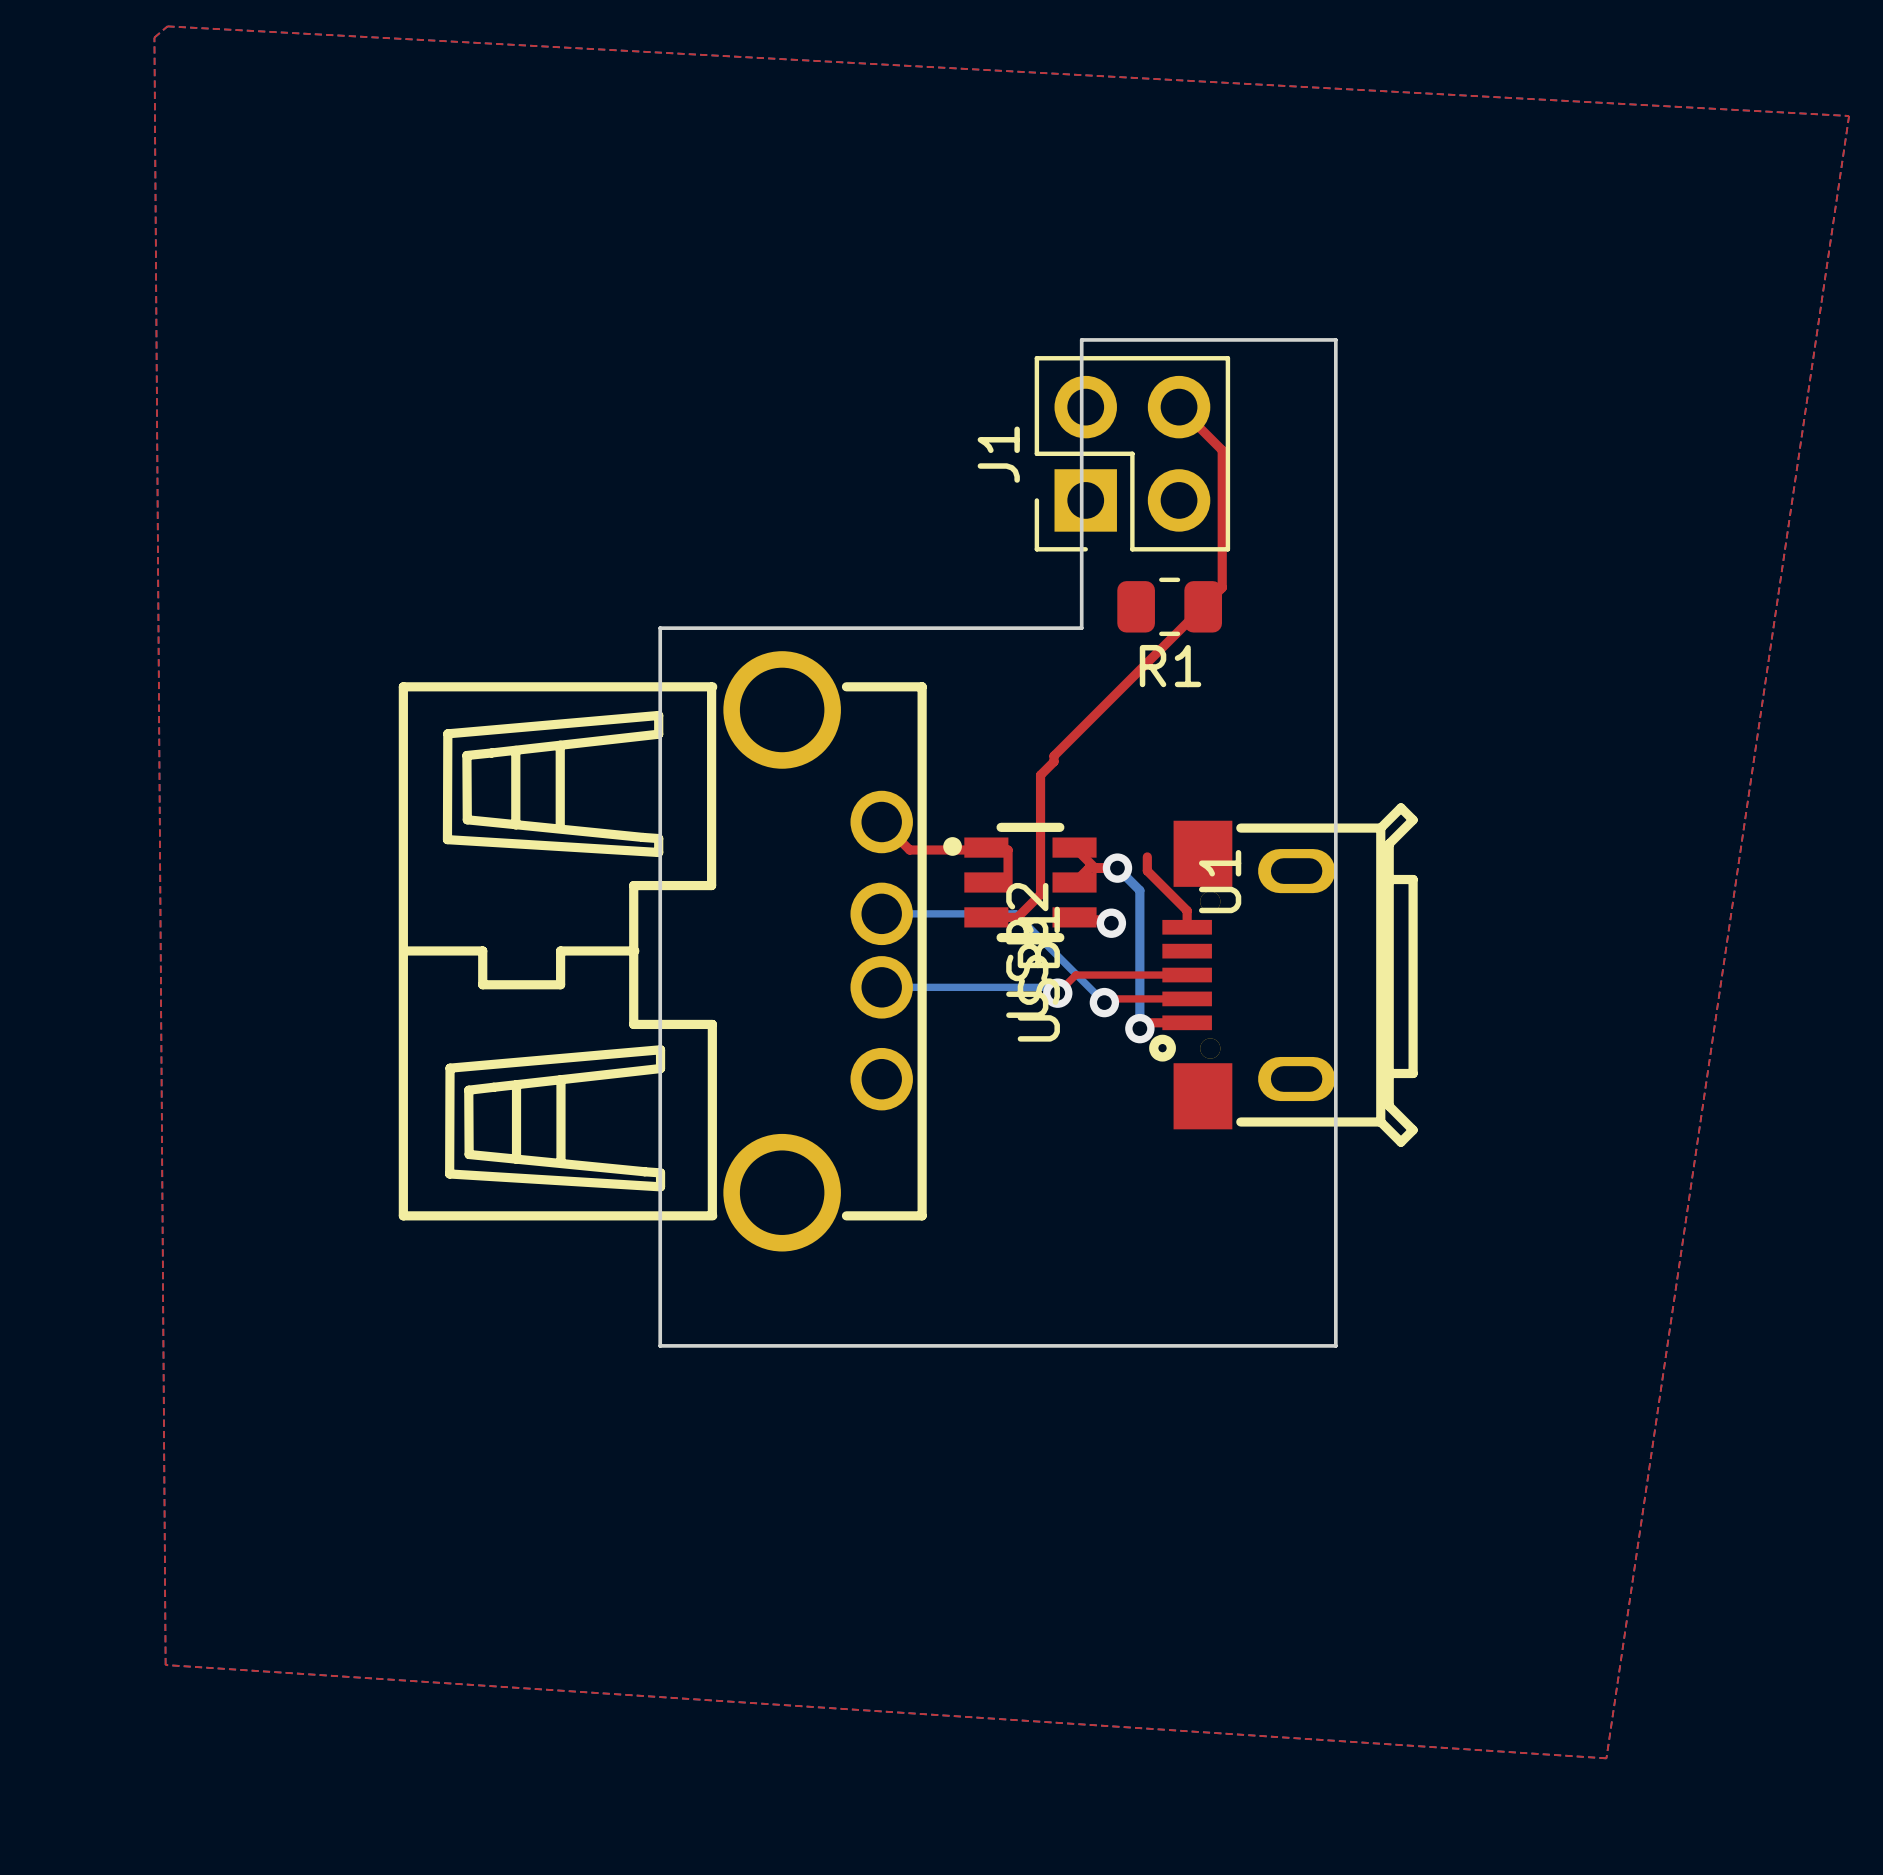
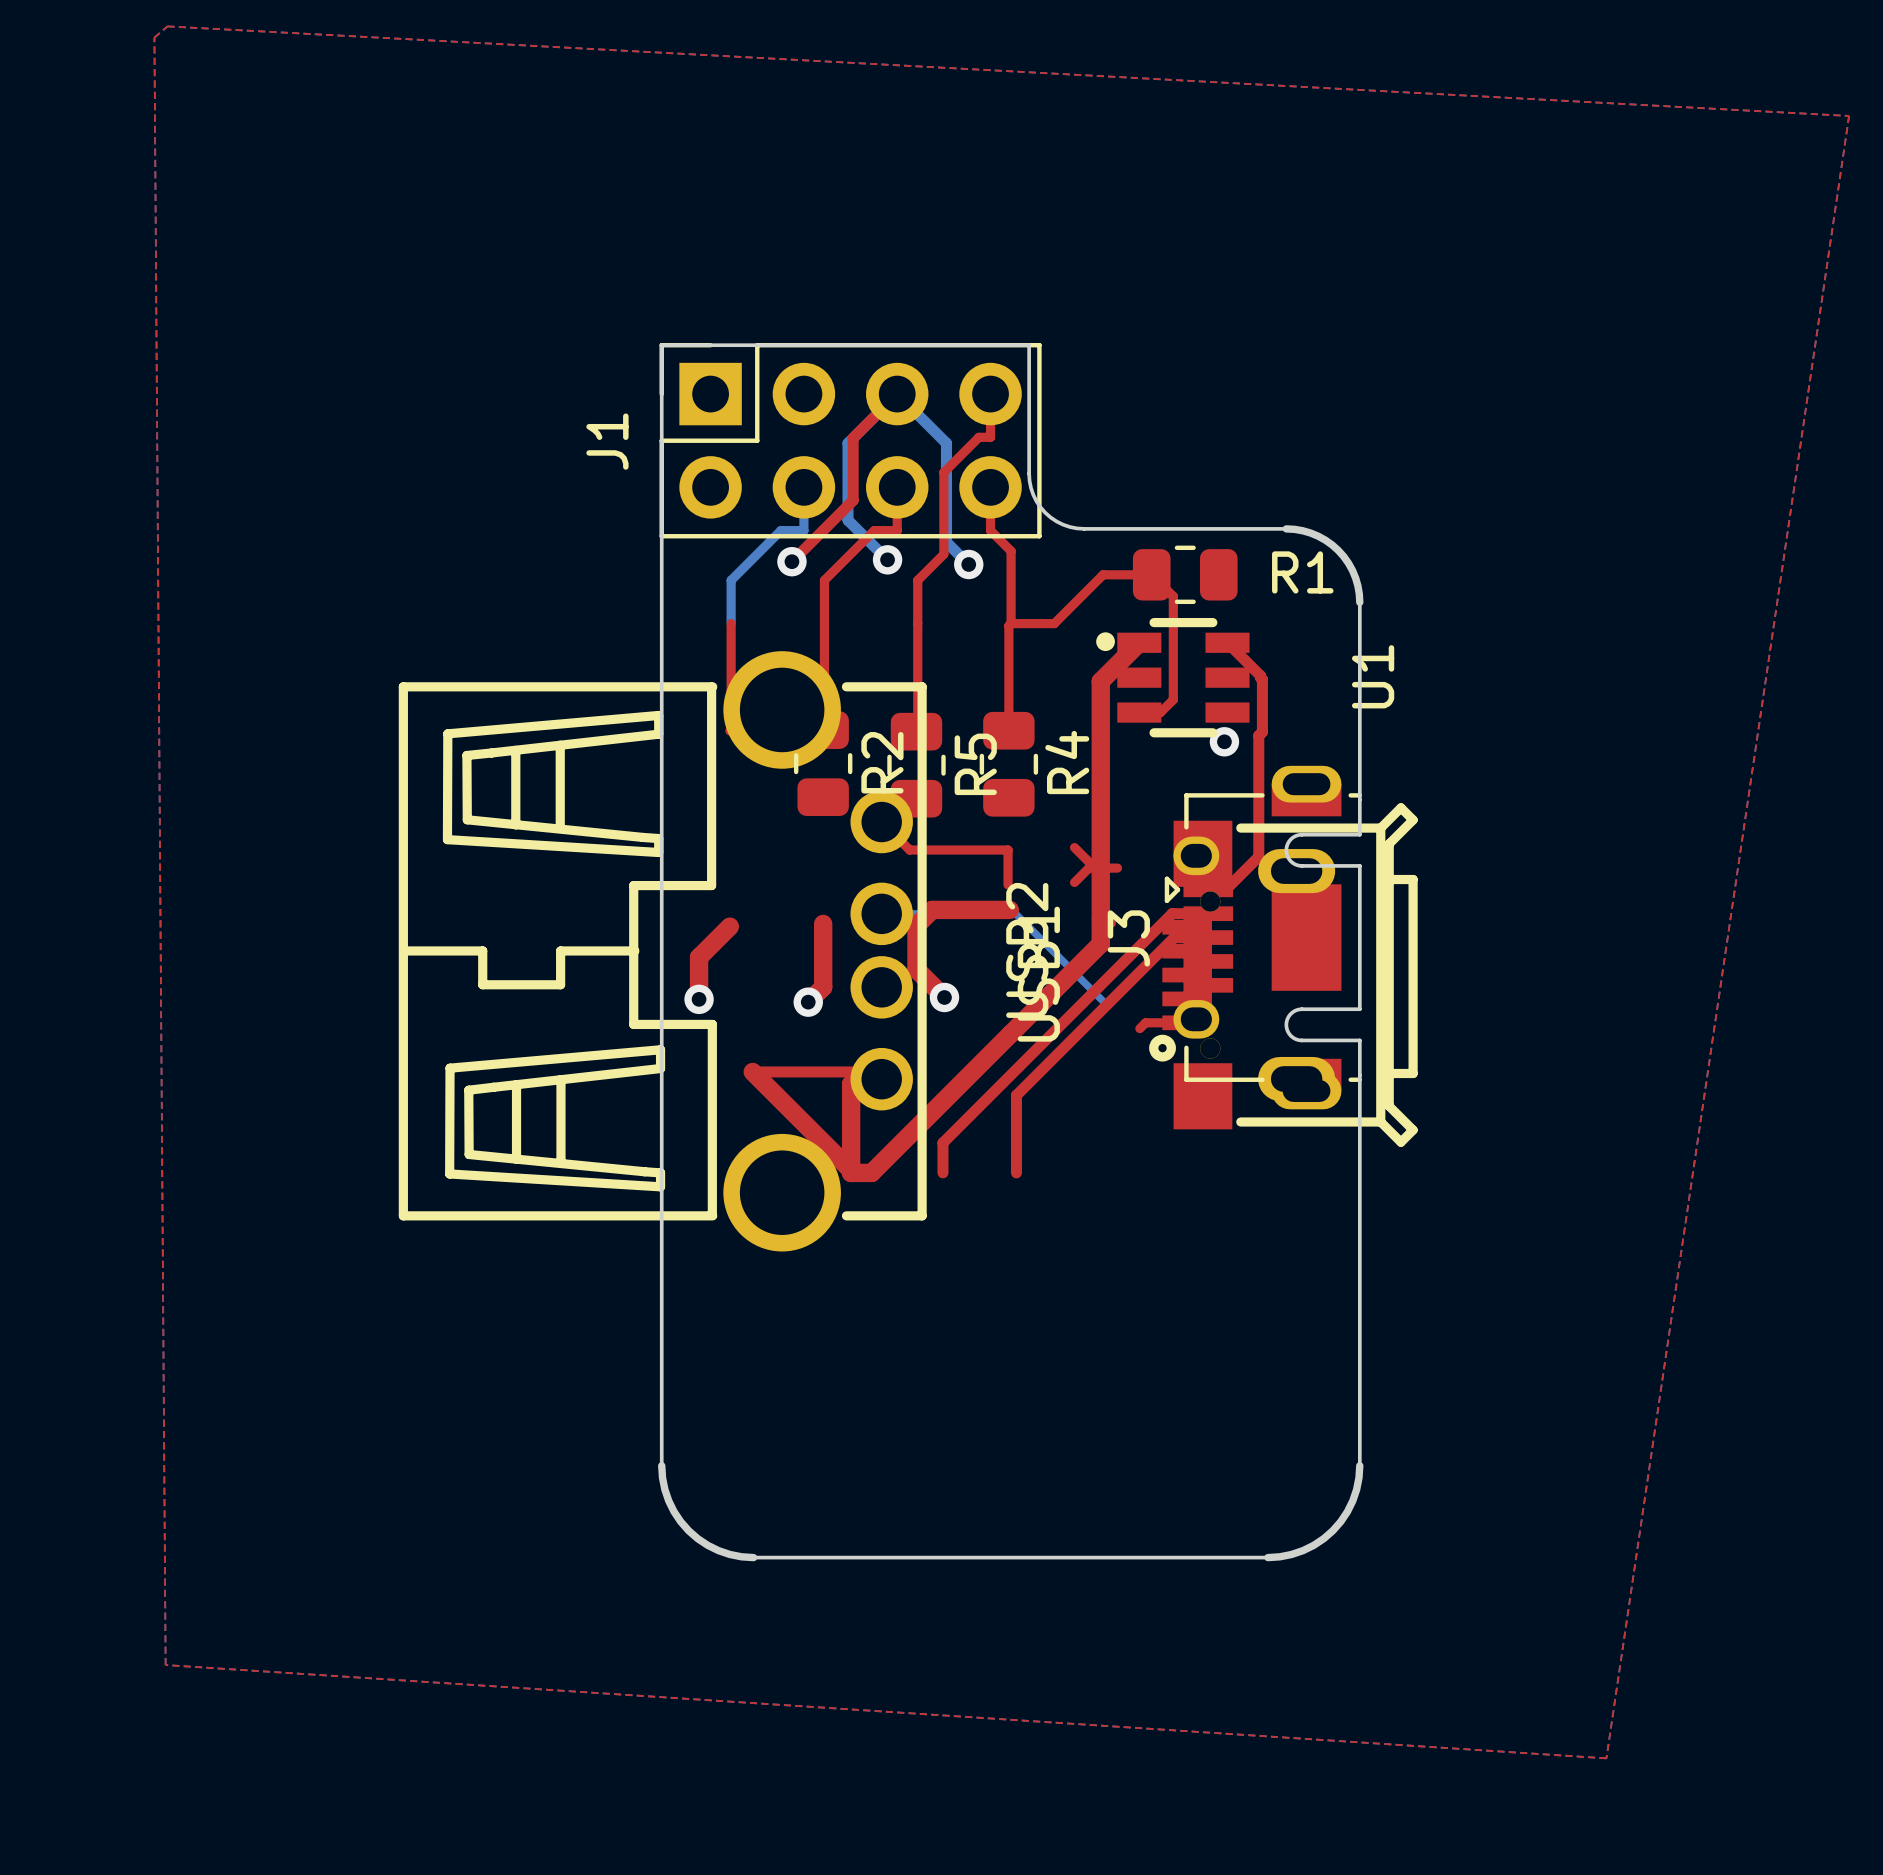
board edge: (1081, 339) (1335, 339) (1335, 1345) (660, 1345) (660, 628) (1081, 628) (1081, 339) -> none
J1 footprint: [1034, 356, 1231, 552] -> [659, 342, 1042, 539]
top track: none -> (897, 394) (853, 438) (853, 500) (791, 561) (785, 561)
top track: none -> (990, 394) (990, 437) (979, 437) (943, 472) (943, 554) (917, 580) (916, 731)
top track: (1179, 407) (1222, 450) (1222, 587) (1054, 755) (1054, 761) (1040, 775) (1040, 894) (1017, 917) (986, 917) -> none
J1 name position: J1 (998, 454) -> J1 (607, 441)
bottom track: none -> (803, 487) (803, 530) (780, 530) (731, 580) (731, 623)
top track: none -> (897, 487) (897, 530) (874, 530) (824, 580) (823, 730)
top track: none -> (990, 487) (990, 530) (1011, 551) (1011, 623)
bottom track: none -> (887, 559) (848, 520) (848, 443) (897, 394) (946, 443) (946, 542) (968, 564)
via: none -> (887, 559)
via: none -> (791, 561)
via: none -> (968, 564)
R1 position: (1169, 606) -> (1185, 574)
top track: none -> (731, 623) (729, 730)
top track: none -> (1011, 623) (1008, 625) (1008, 730)
top track: none -> (1011, 623) (1054, 623) (1103, 574) (1151, 574) (1173, 596) (1173, 699) (1160, 712) (1139, 712)
top track: none -> (1139, 642) (1100, 681) (1100, 943) (871, 1172) (851, 1172) (851, 1084) (863, 1071) (752, 1071) (851, 1170)
top track: none -> (1227, 642) (1262, 679) (1262, 731) (1258, 735) (1258, 856) (1225, 889) (1208, 889)
R1 name position: R1 (1170, 666) -> R1 (1302, 572)
via: none -> (1224, 741)
R2: none -> (823, 763)
R4: none -> (1008, 764)
R5: none -> (916, 765)
board edge: none -> (1359, 799) (1359, 594) (1352, 570) (1343, 556) (1325, 540) (1310, 533) (1294, 529) (1084, 528) (1063, 524) (1050, 517) (1036, 501) (1029, 480) (1029, 345) (661, 345) (661, 1465) (662, 1477) (668, 1500) (674, 1511) (688, 1530) (697, 1538) (718, 1550) (741, 1556) (753, 1557) (1267, 1557) (1291, 1554) (1303, 1550) (1323, 1538) (1340, 1521) (1347, 1511) (1356, 1489) (1358, 1477) (1359, 1075)
top track: (1147, 856) (1147, 870) (1187, 910) (1187, 927) -> none
bottom track: (1117, 868) (1139, 890) (1139, 1028) -> none
via: (1117, 868) -> none
U1 position: (1019, 882) -> (1172, 677)
top track: none -> (1009, 909) (932, 909) (916, 925) (916, 969) (944, 997)
top track: none -> (1208, 913) (1172, 913) (942, 1142) (942, 1172)
top track: none -> (823, 923) (823, 987) (808, 1002)
via: (1111, 923) -> none
top track: none -> (729, 926) (699, 957) (699, 999)
top track: none -> (1208, 937) (1174, 937) (1016, 1095) (1016, 1172)
J3: none -> (1263, 937)
top track: (1187, 975) (1075, 975) (1057, 993) -> none
bottom track: (881, 987) (1051, 987) (1057, 993) -> none
via: (1057, 993) -> none
via: none -> (944, 997)
top track: (1187, 998) (1108, 998) (1104, 1002) -> none
via: none -> (699, 999)
via: none -> (808, 1002)
via: (1104, 1002) -> none
via: (1139, 1028) -> none

